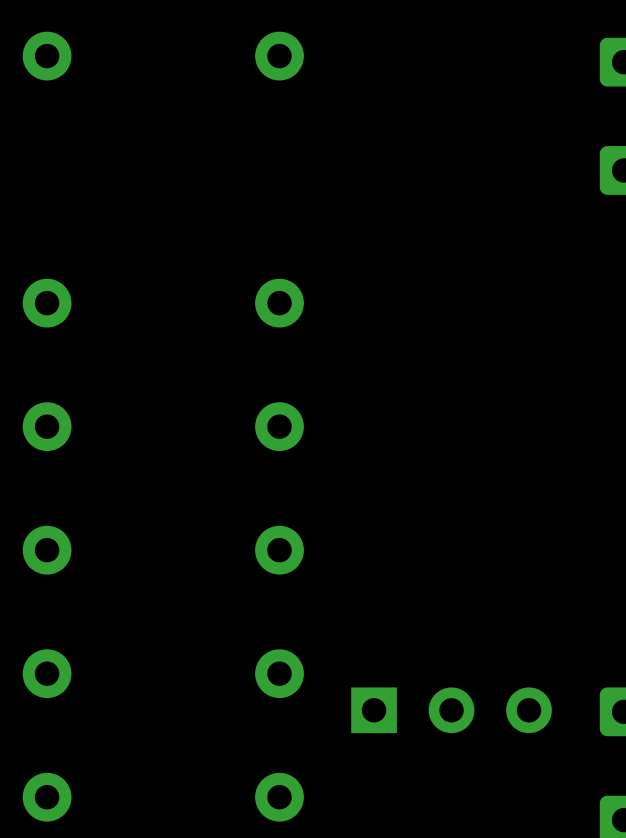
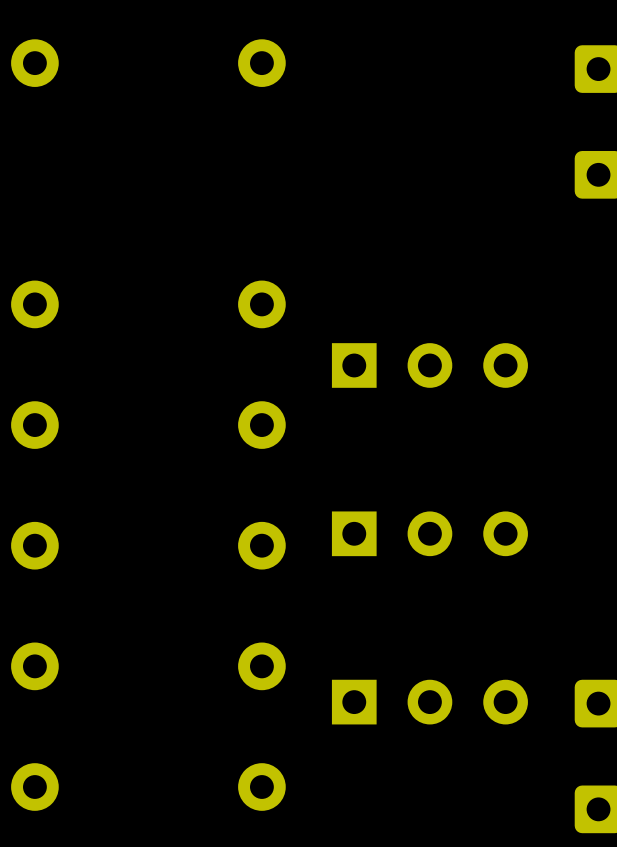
part: none -> (429, 365)
part: none -> (429, 533)

